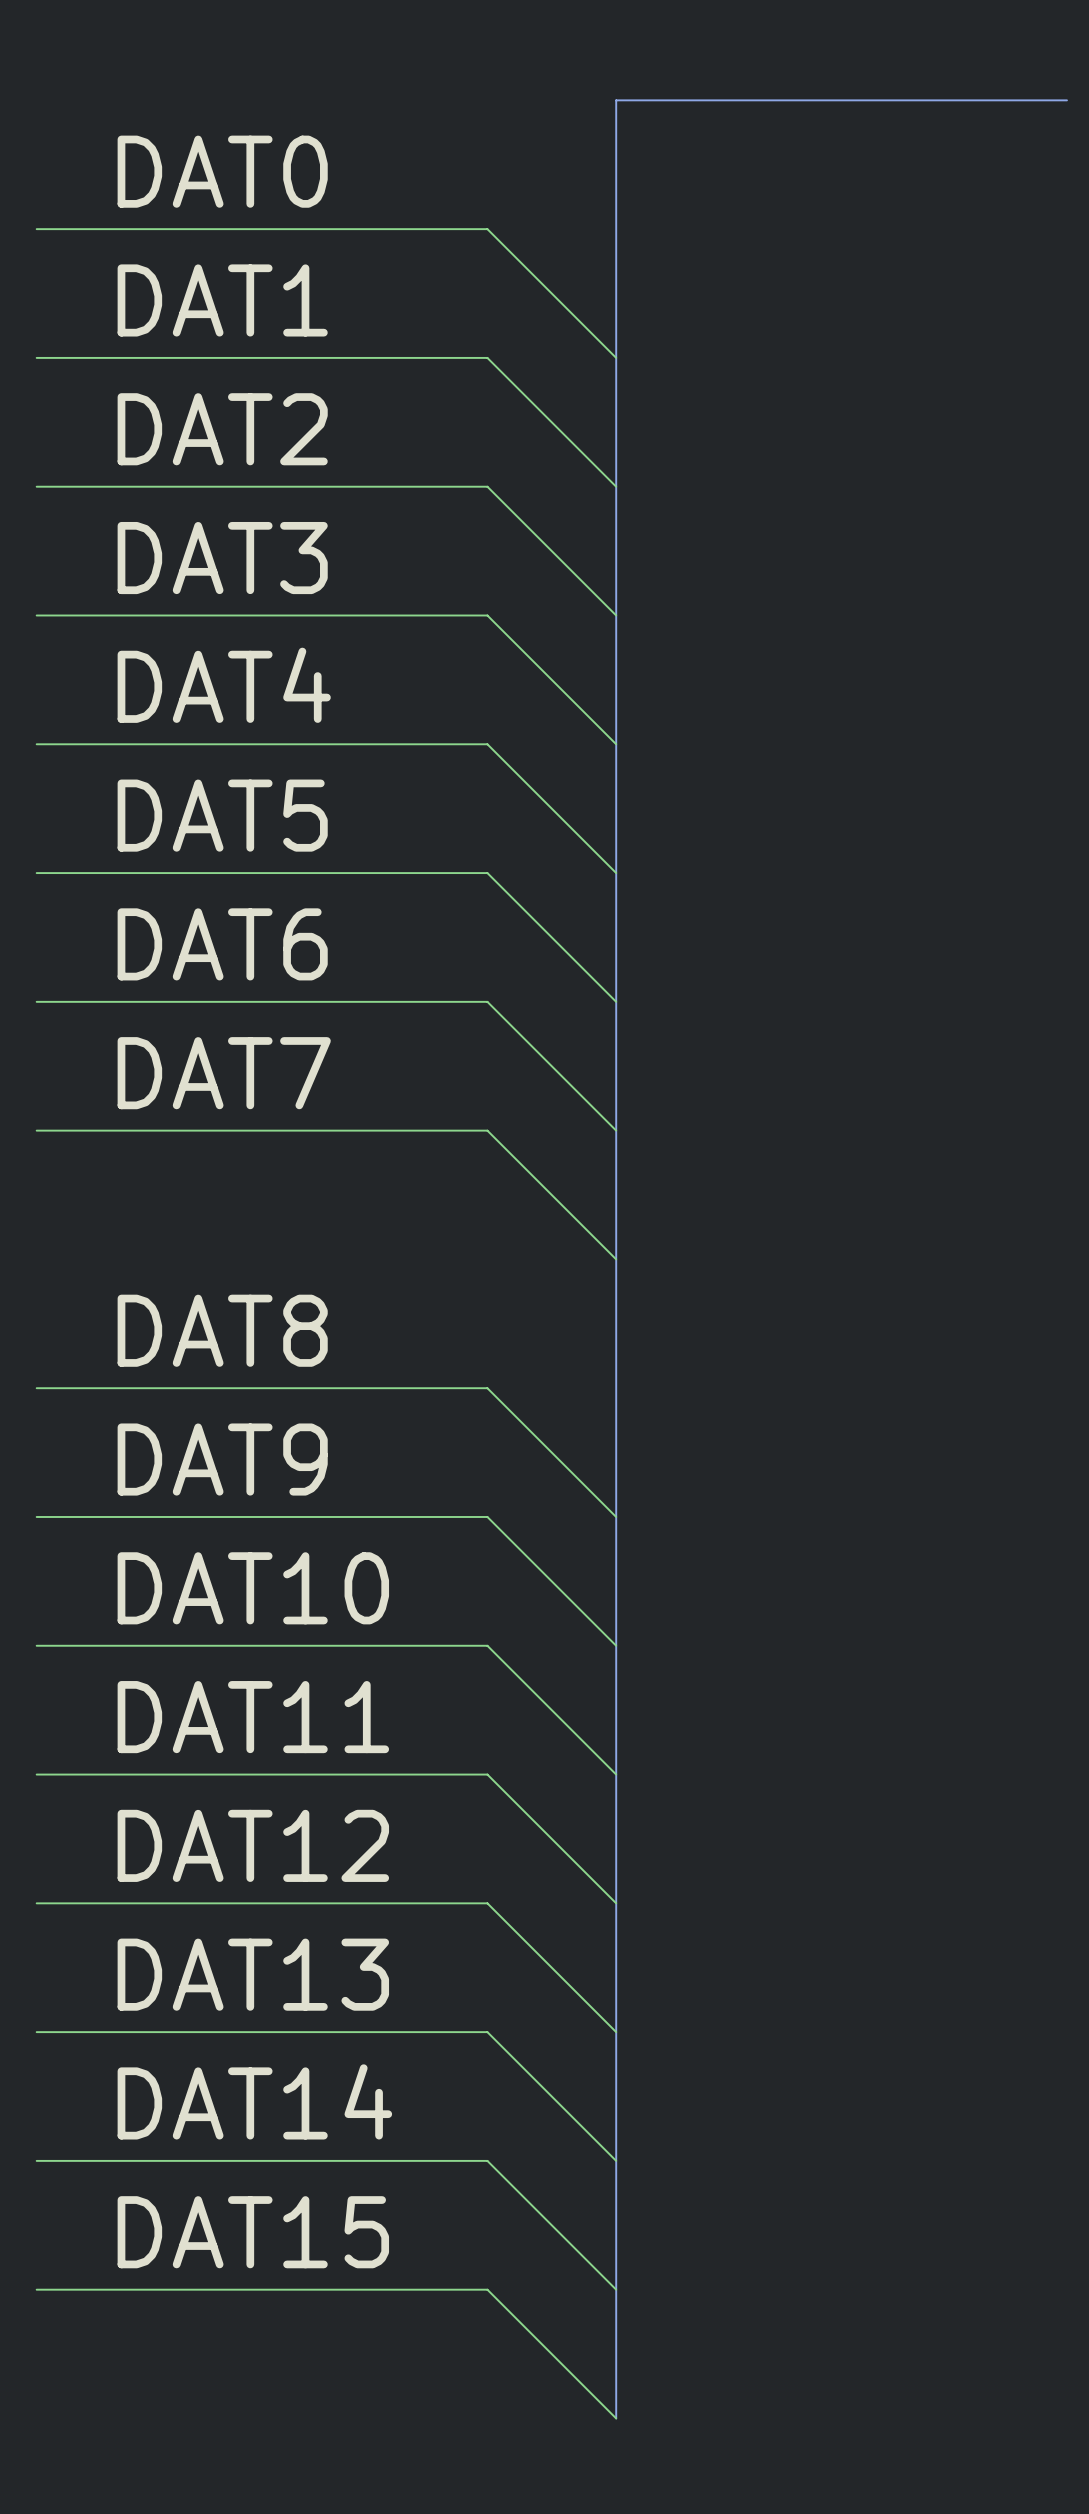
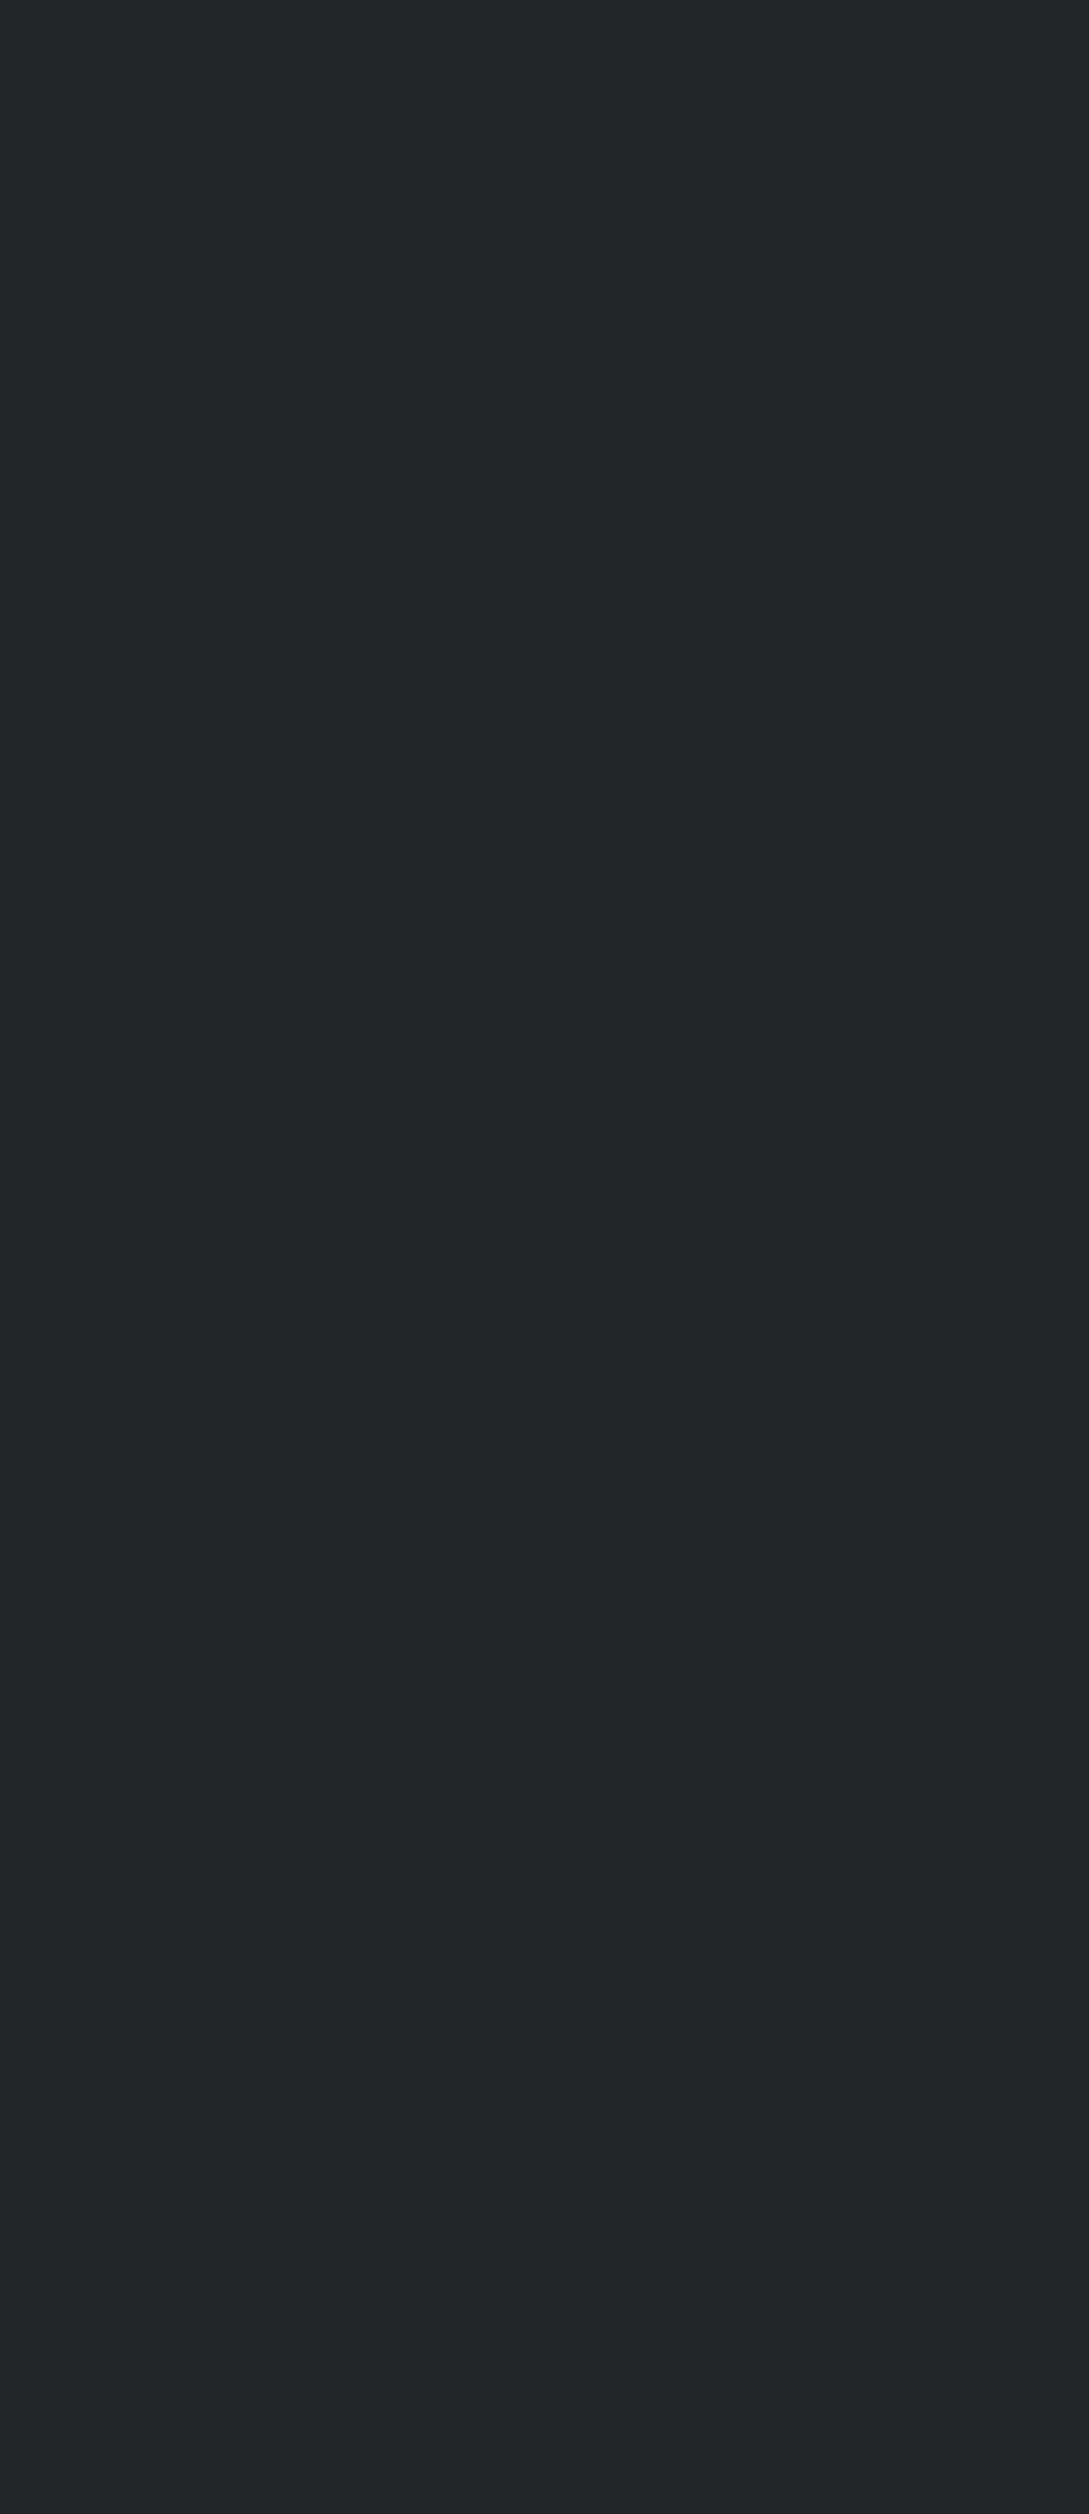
bus: (1066, 100) (616, 100) (616, 2418) -> none
label: DAT0 (222, 171) -> none
wire: (36, 229) (487, 229) (616, 357) -> none
label: DAT1 (222, 300) -> none
wire: (36, 357) (487, 357) (616, 486) -> none
label: DAT2 (222, 429) -> none
wire: (36, 486) (487, 486) (616, 615) -> none
label: DAT3 (222, 558) -> none
wire: (36, 615) (487, 615) (616, 744) -> none
label: DAT4 (224, 685) -> none
wire: (36, 744) (487, 744) (616, 873) -> none
label: DAT5 (222, 815) -> none
wire: (36, 873) (487, 873) (616, 1001) -> none
label: DAT6 (222, 944) -> none
wire: (36, 1001) (487, 1001) (616, 1130) -> none
label: DAT7 (224, 1073) -> none
wire: (36, 1130) (487, 1130) (616, 1259) -> none
label: DAT8 (222, 1330) -> none
wire: (36, 1388) (487, 1388) (616, 1516) -> none
label: DAT9 (222, 1459) -> none
wire: (36, 1516) (487, 1516) (616, 1645) -> none
label: DAT10 (253, 1588) -> none
wire: (36, 1645) (487, 1645) (616, 1774) -> none
label: DAT11 (253, 1717) -> none
wire: (36, 1774) (487, 1774) (616, 1903) -> none
label: DAT12 (253, 1845) -> none
wire: (36, 1903) (487, 1903) (616, 2032) -> none
label: DAT13 (253, 1974) -> none
wire: (36, 2032) (487, 2032) (616, 2160) -> none
label: DAT14 (254, 2101) -> none
wire: (36, 2160) (487, 2160) (616, 2289) -> none
label: DAT15 (253, 2232) -> none
wire: (36, 2289) (487, 2289) (616, 2418) -> none

